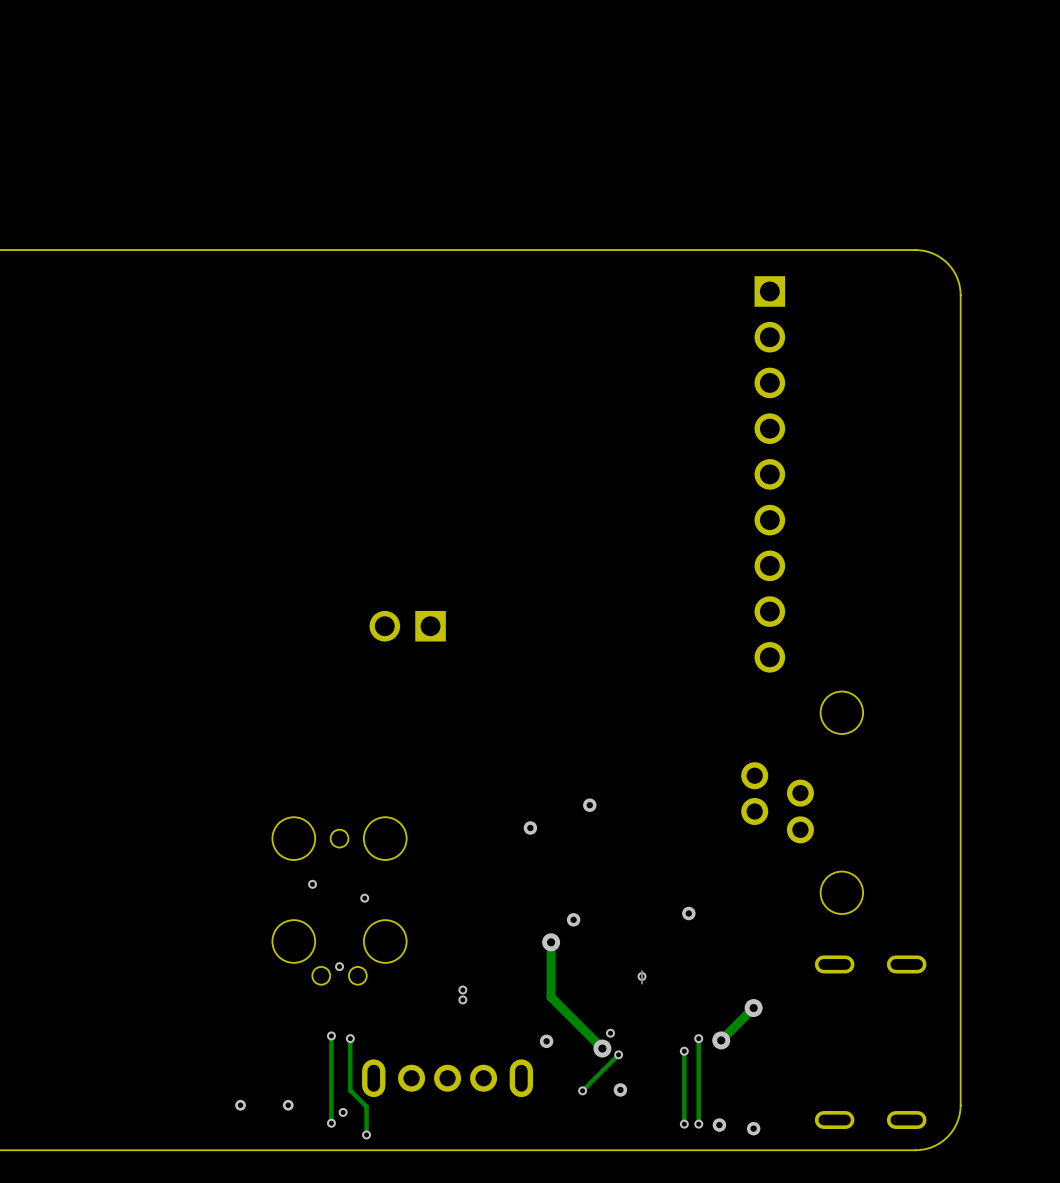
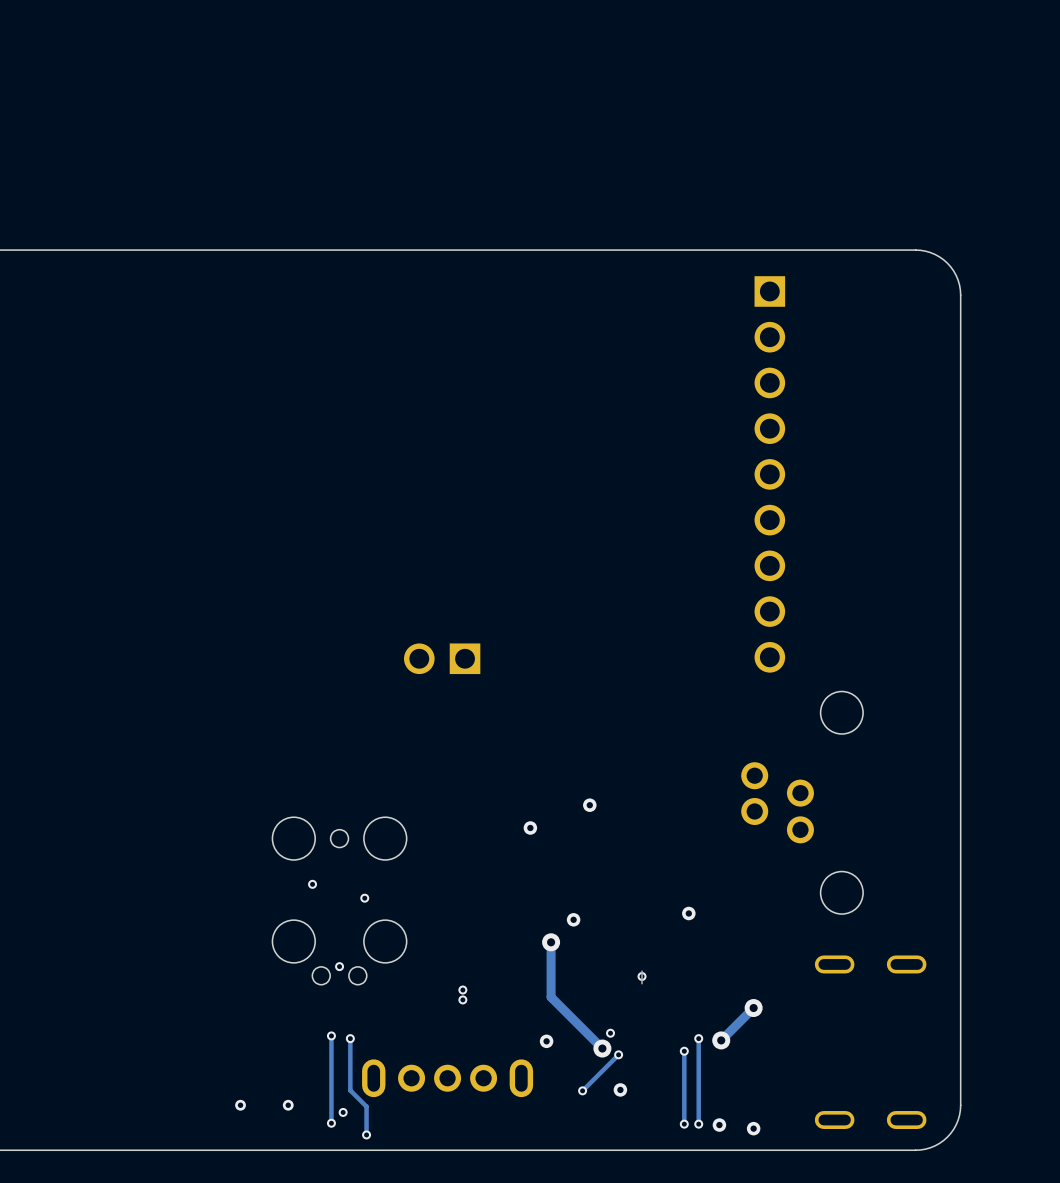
part position: (407, 626) -> (442, 658)

